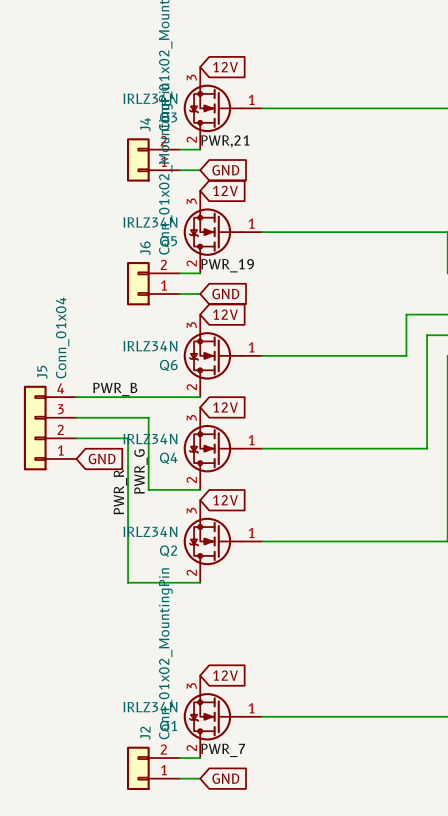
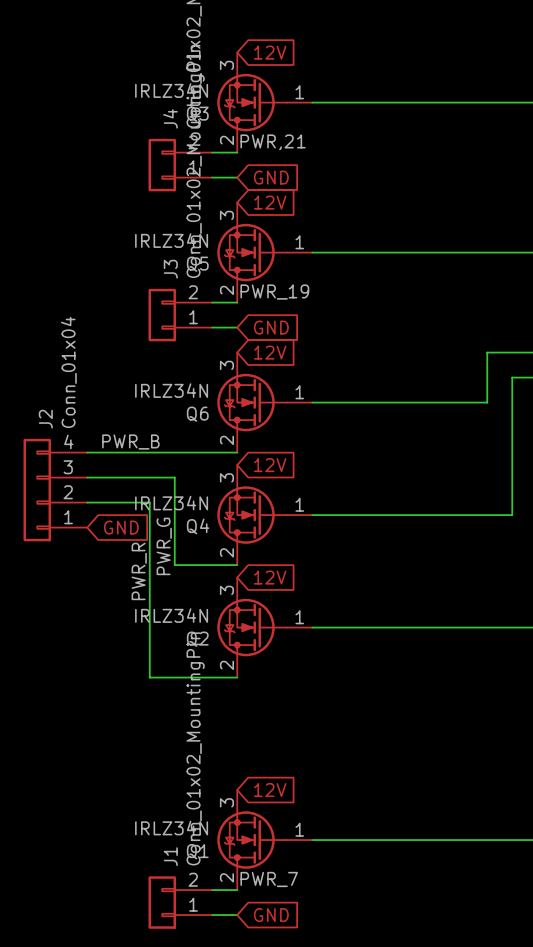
J6 name: J6 (145, 248) -> J3 (170, 269)
J5 name: J5 (42, 372) -> J2 (45, 419)
J2 name: J2 (145, 733) -> J1 (170, 856)

